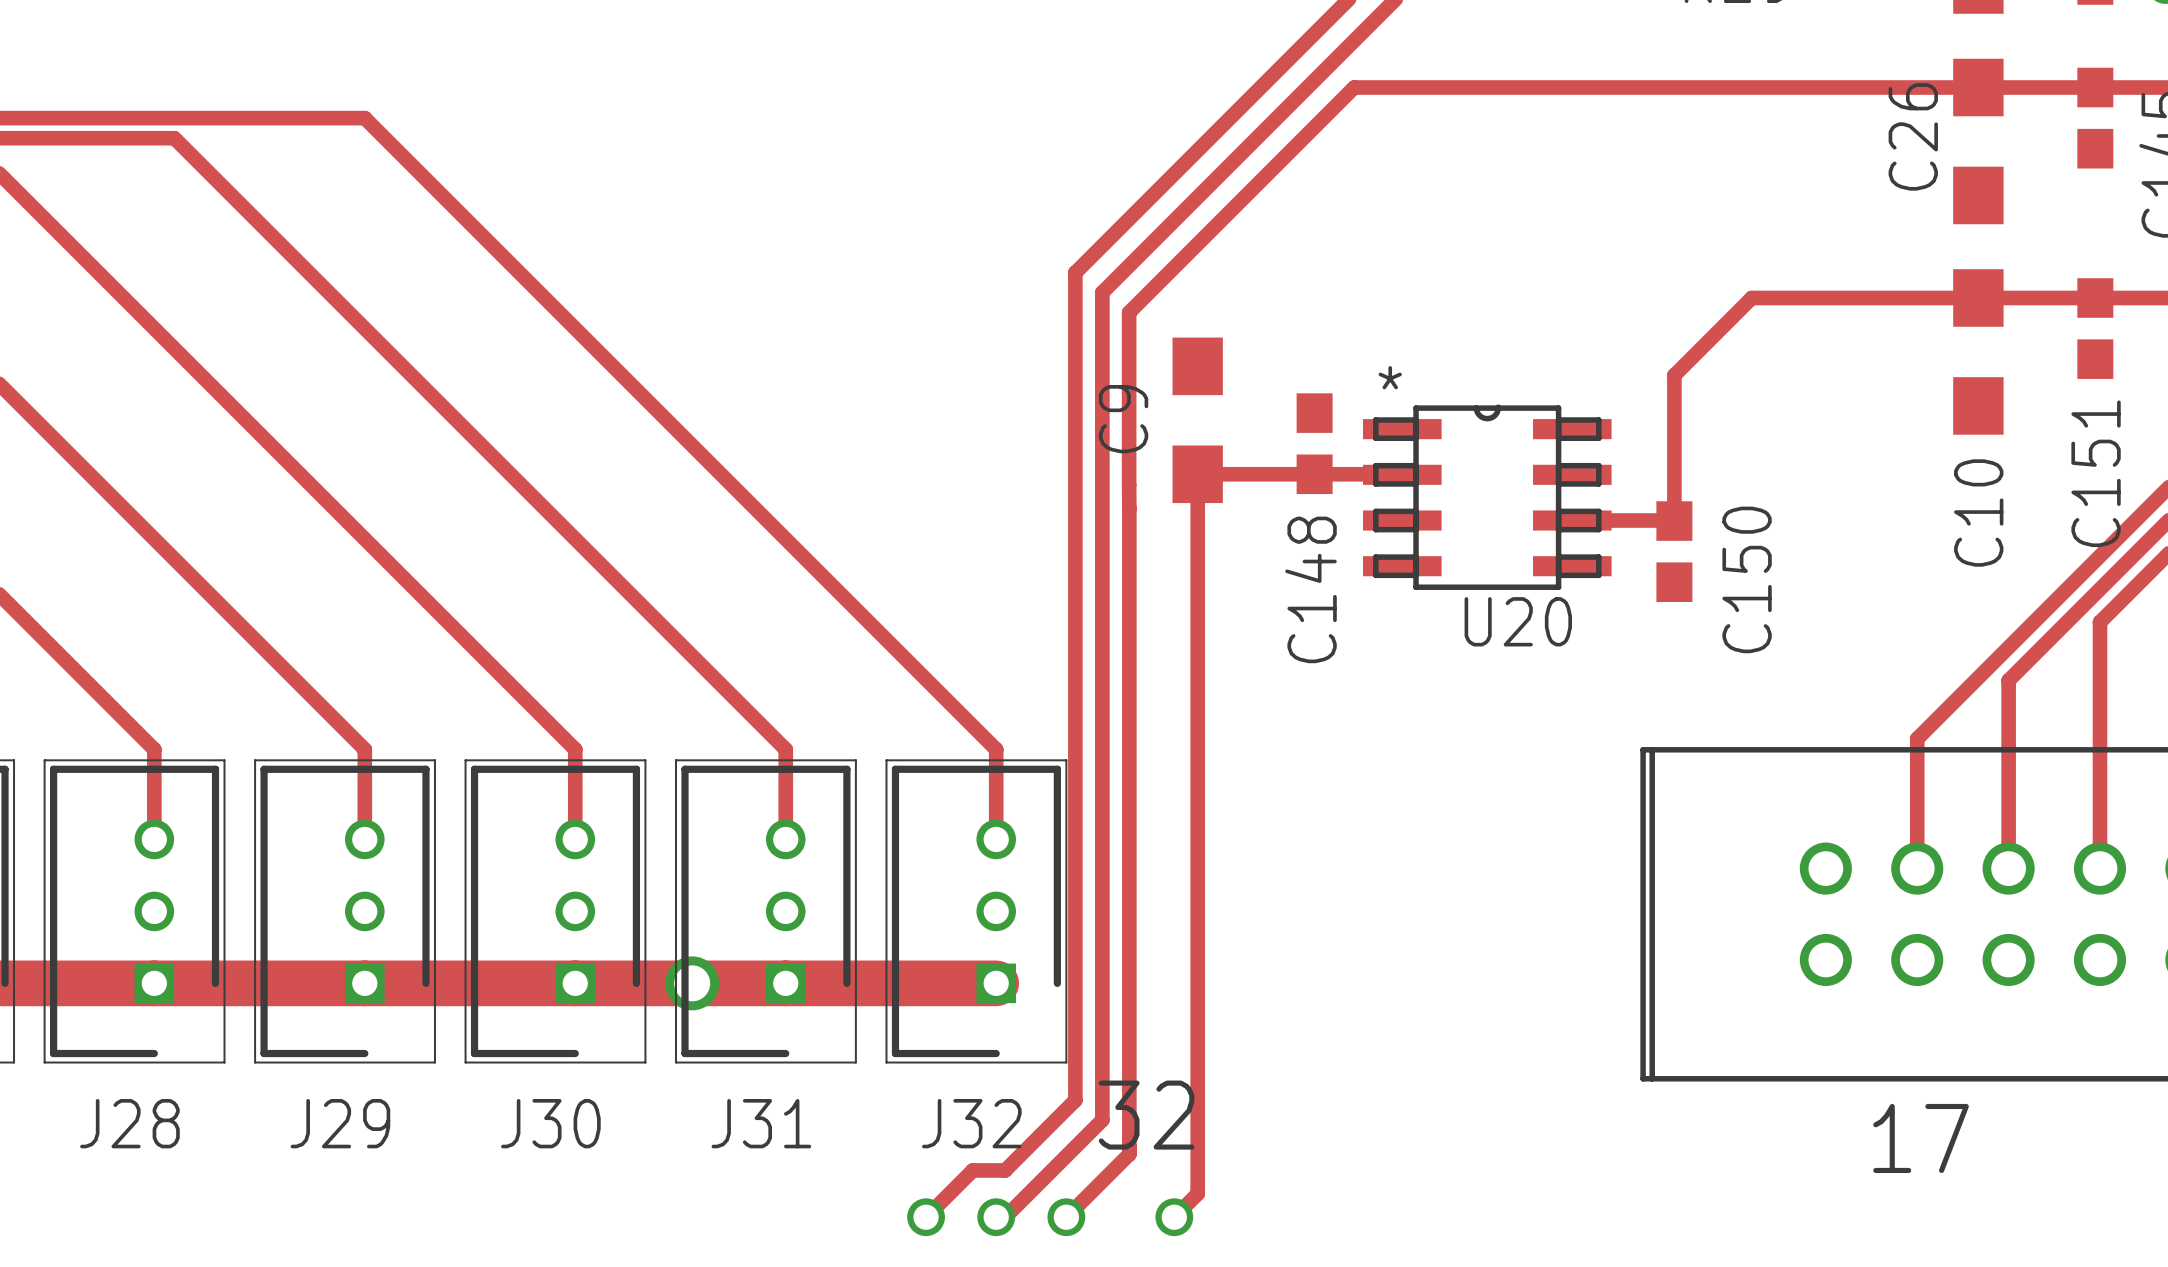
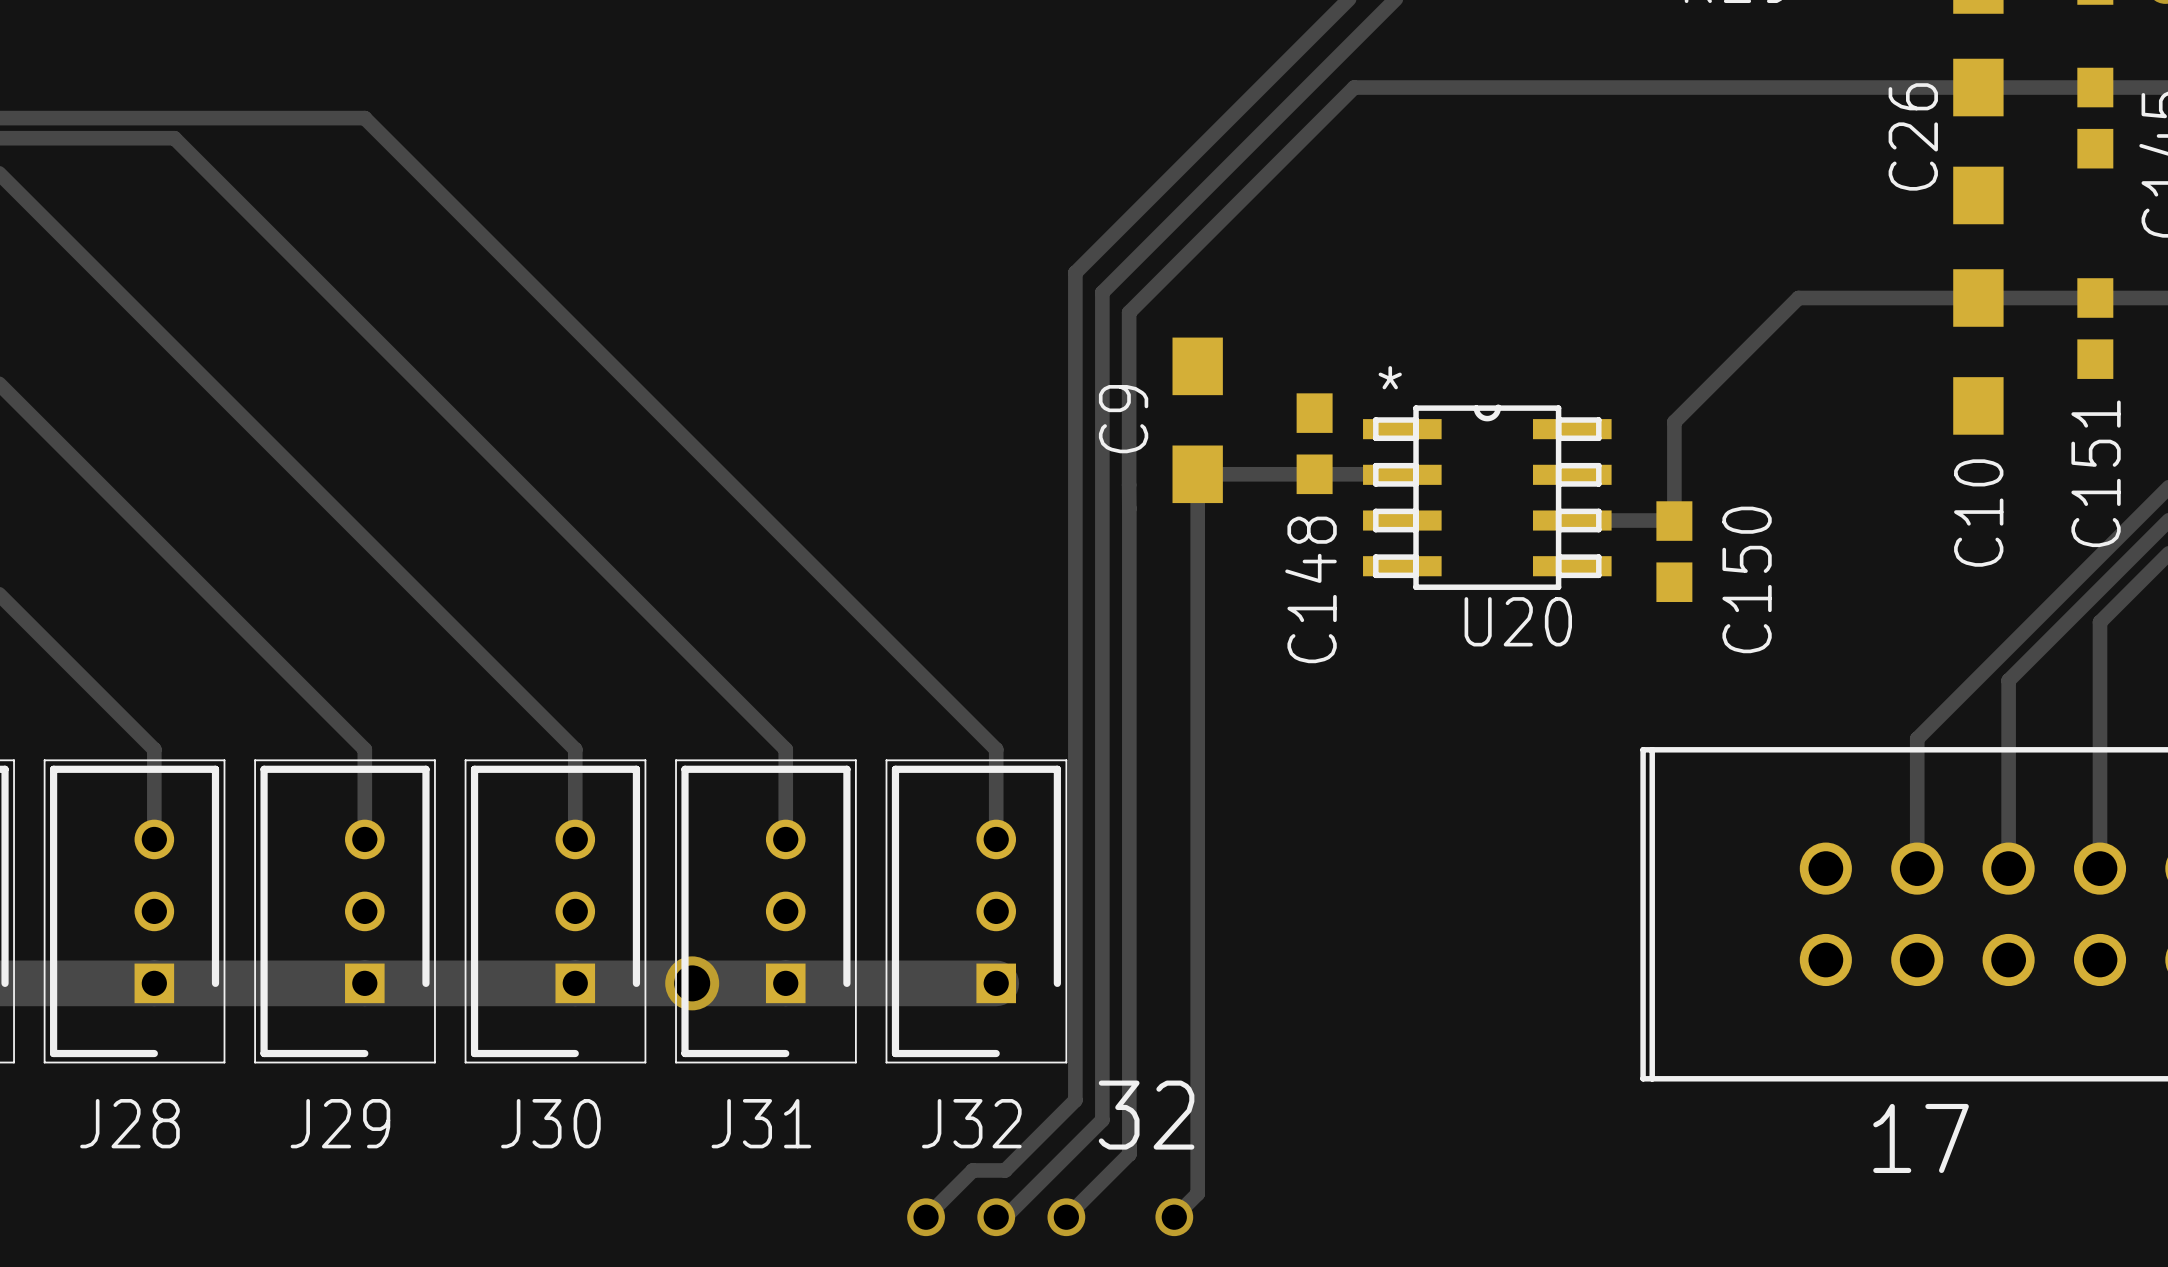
track: (1798, 298) (1751, 298) (1674, 375) (1674, 422) -> (1798, 298) (1674, 422)

